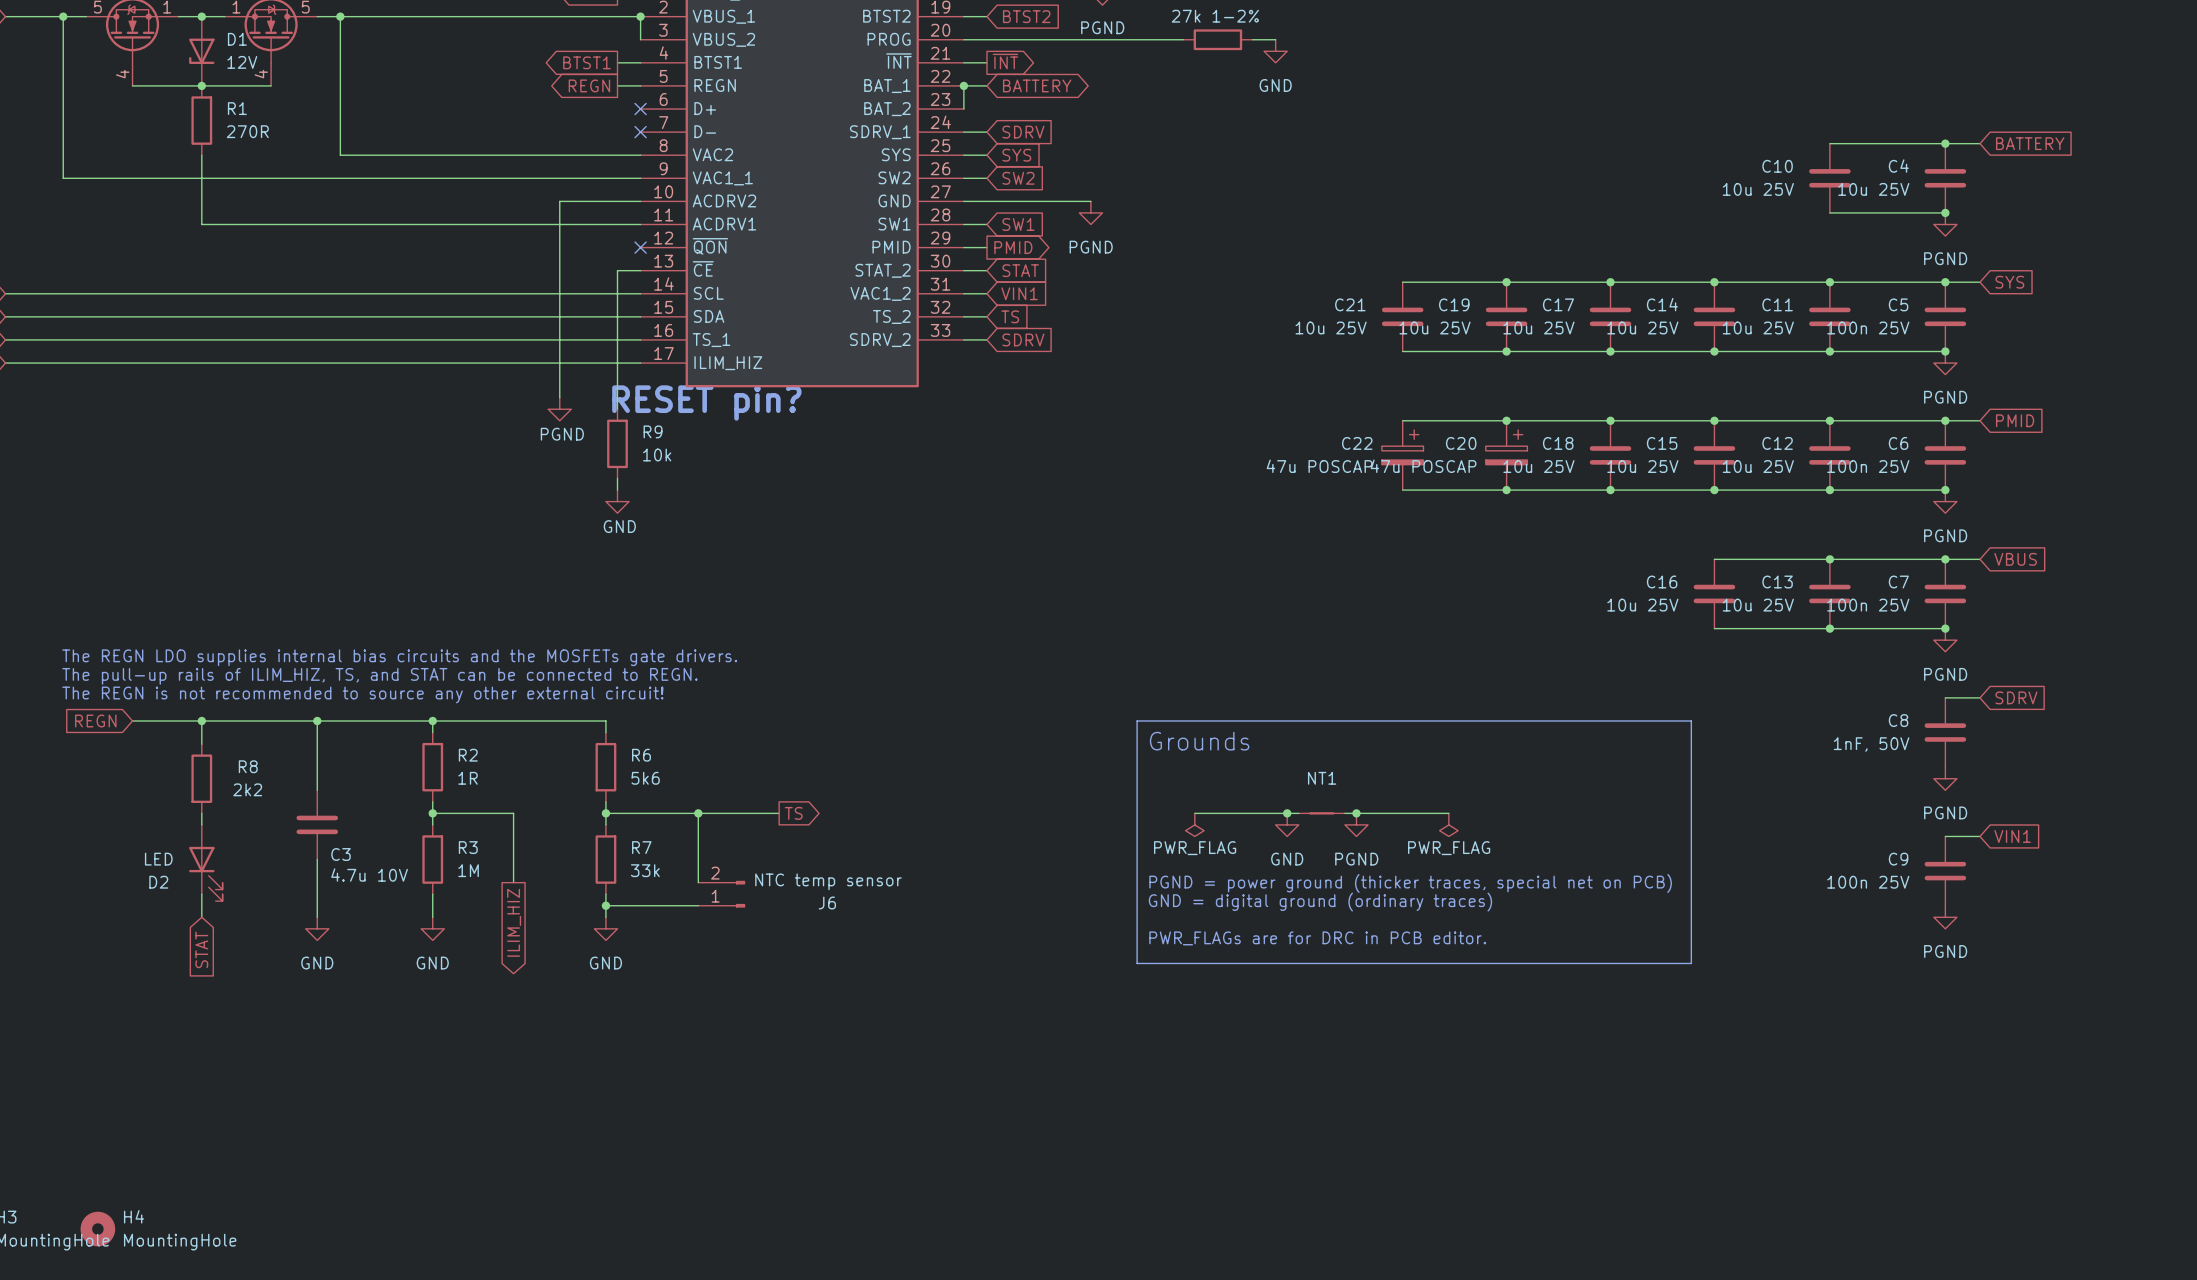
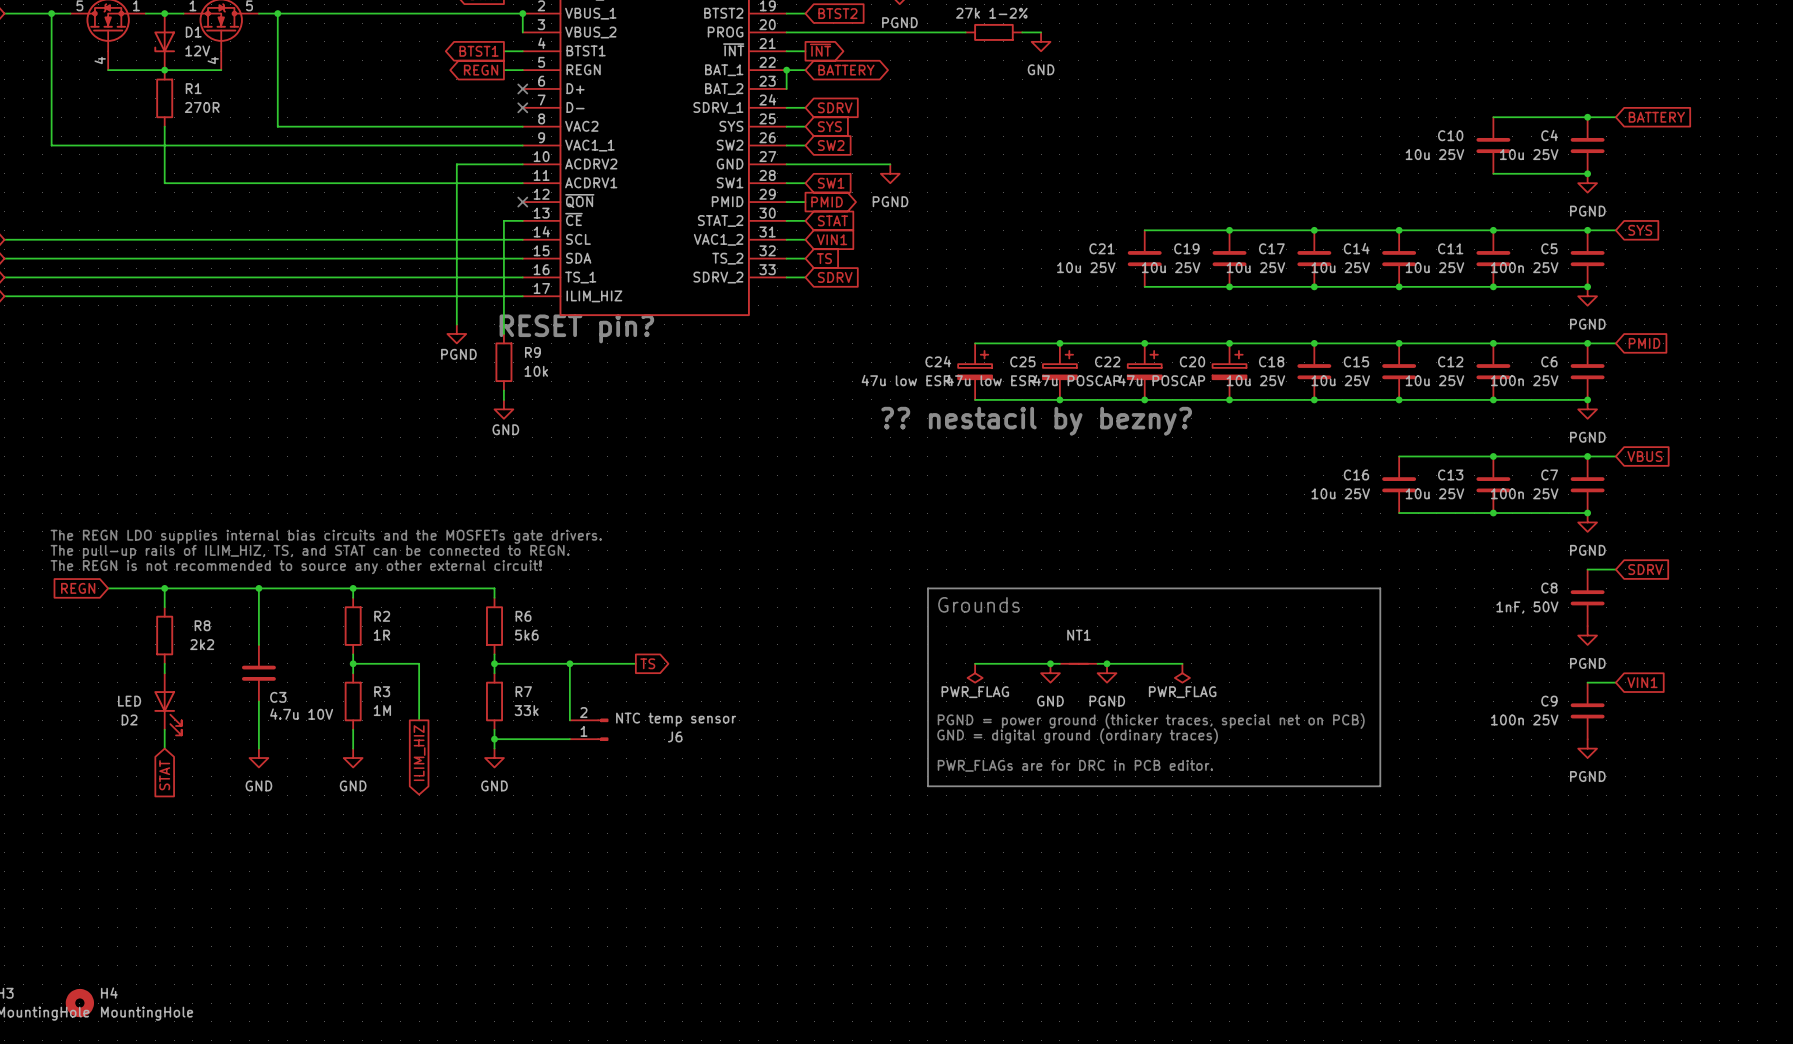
wire: none -> (975, 343) (1144, 343)
junction: none -> (1059, 343)
junction: none -> (1144, 343)
C24: none -> 47u low ESR (975, 371)
C25: none -> 47u low ESR (1059, 371)
wire: none -> (975, 399) (1144, 399)
junction: none -> (1059, 399)
junction: none -> (1144, 399)
text: none -> ?? nestacil by bezny? (1036, 421)

